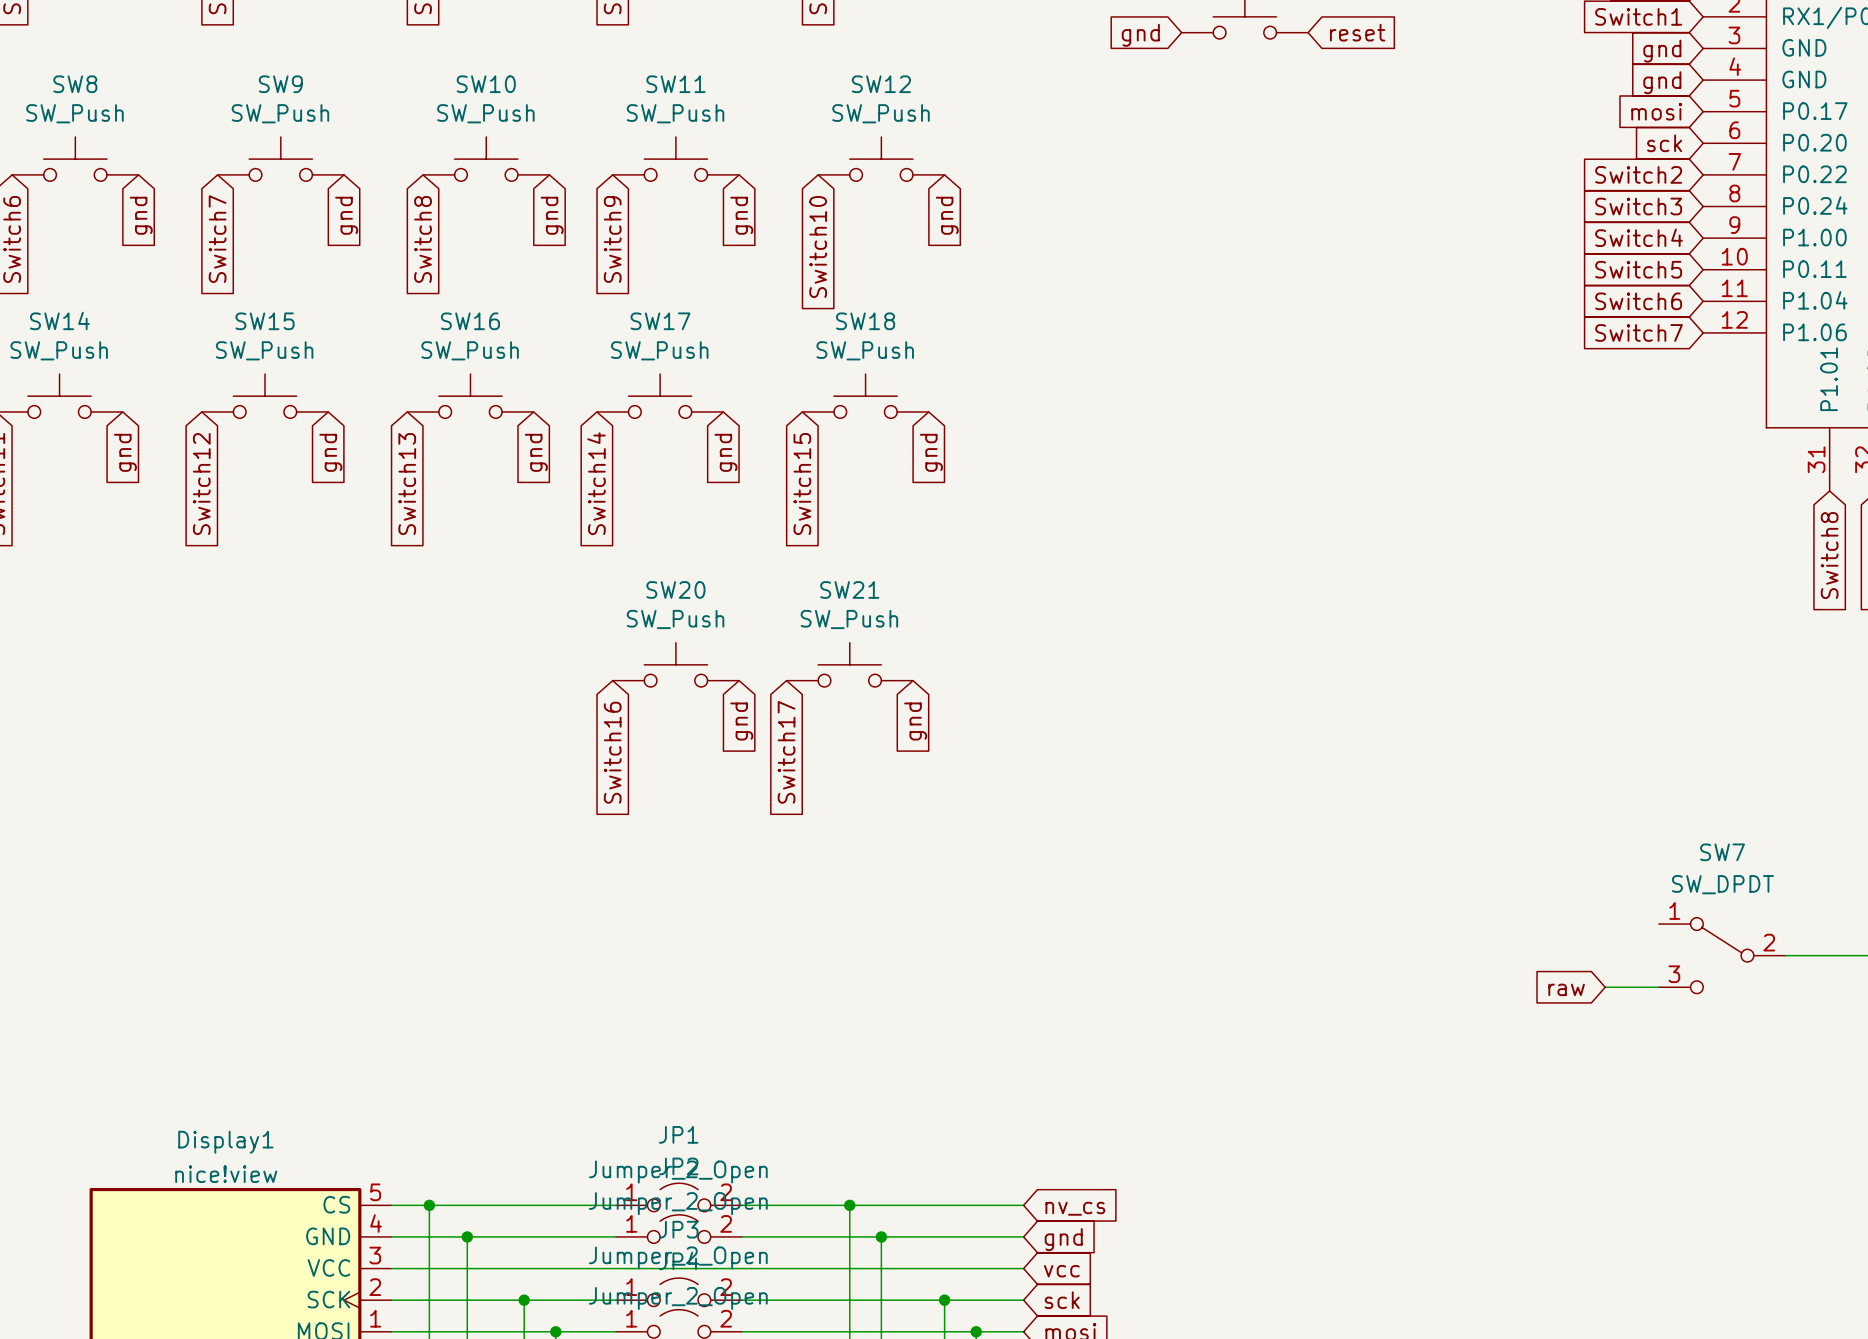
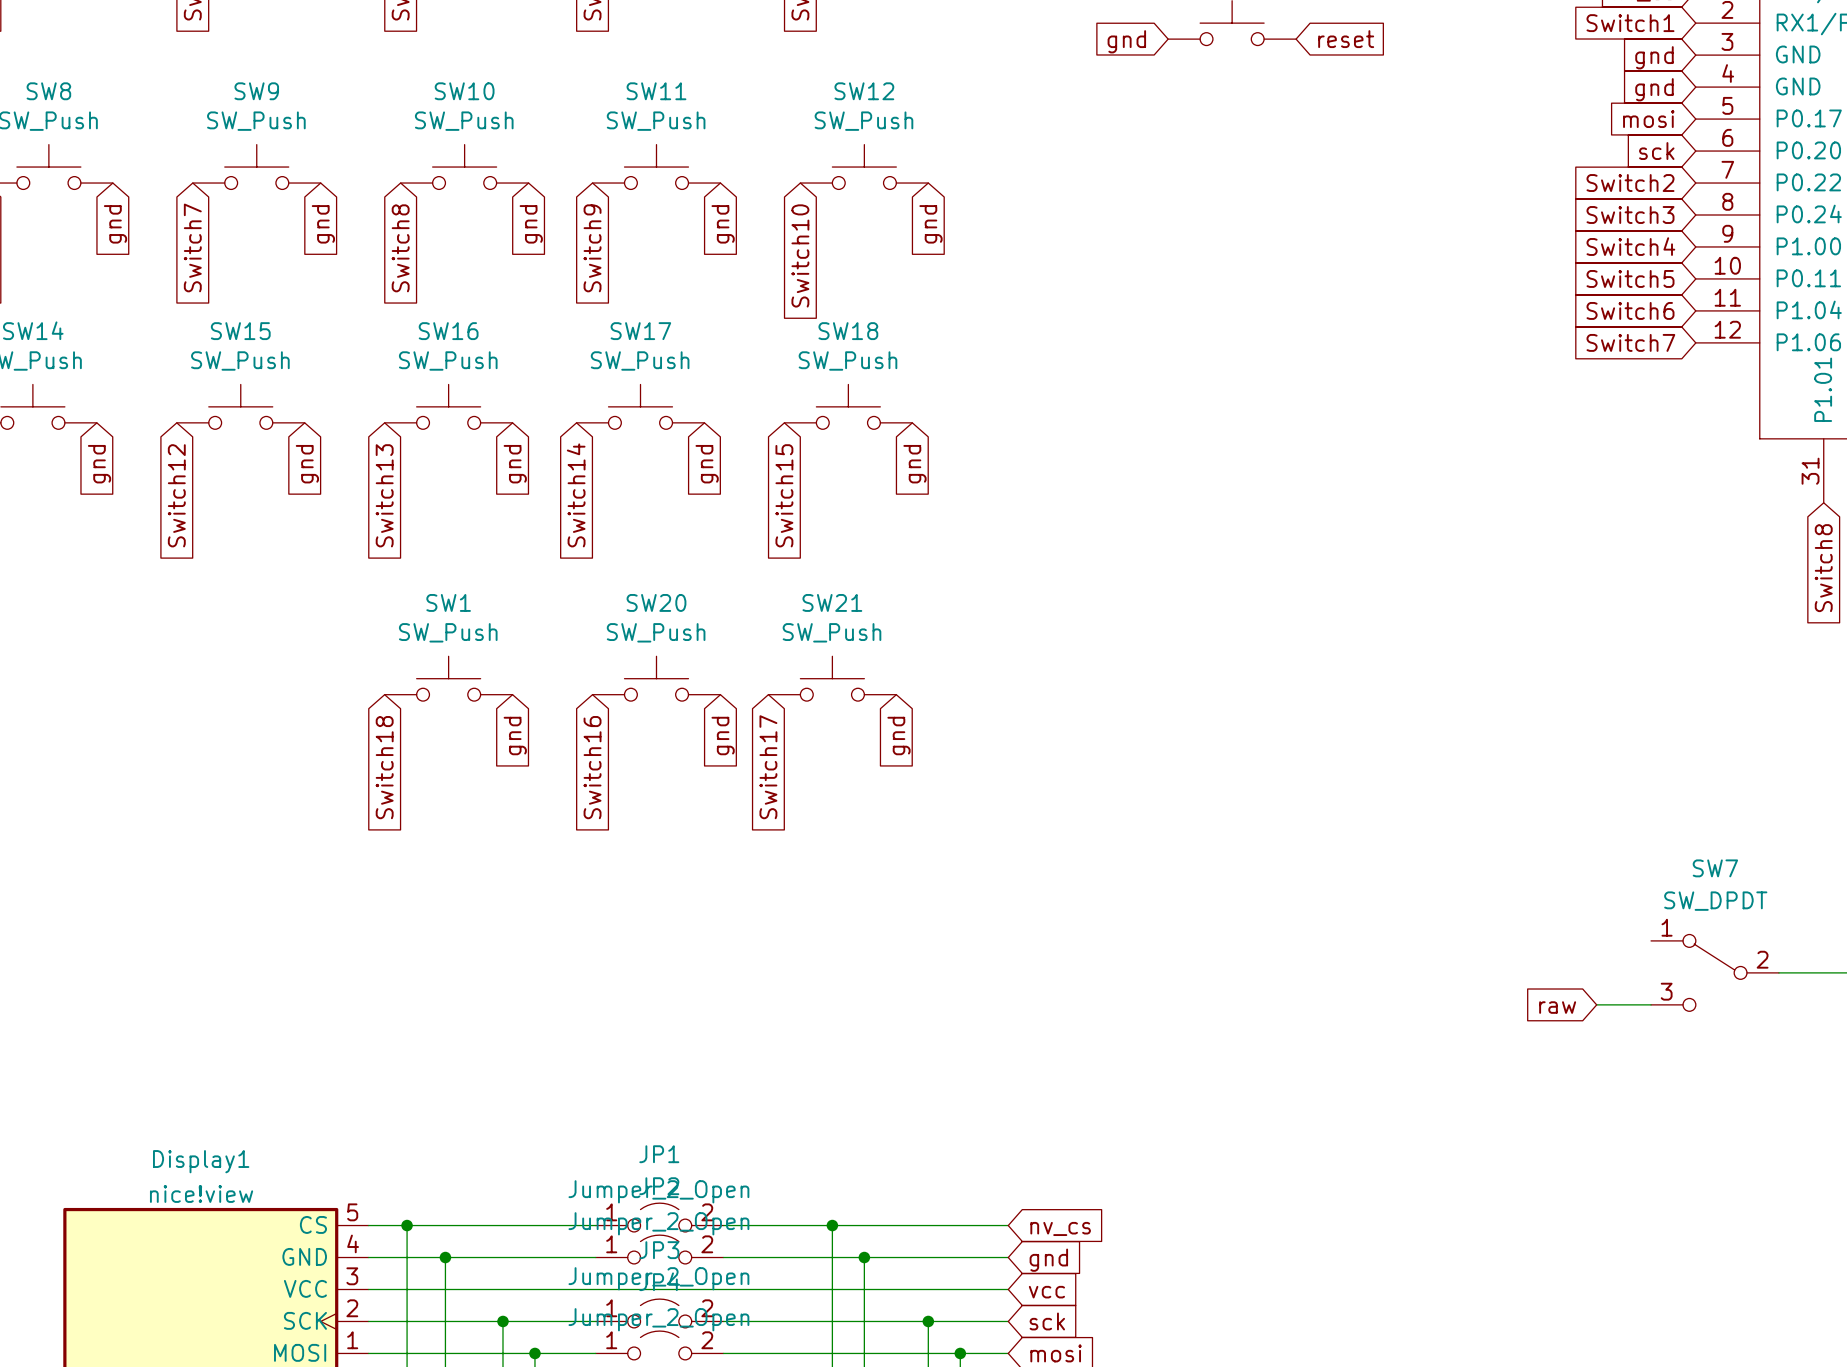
SW1: none -> SW_Push (448, 678)
global label: none -> gnd (515, 736)
global label: none -> Switch18 (384, 767)

